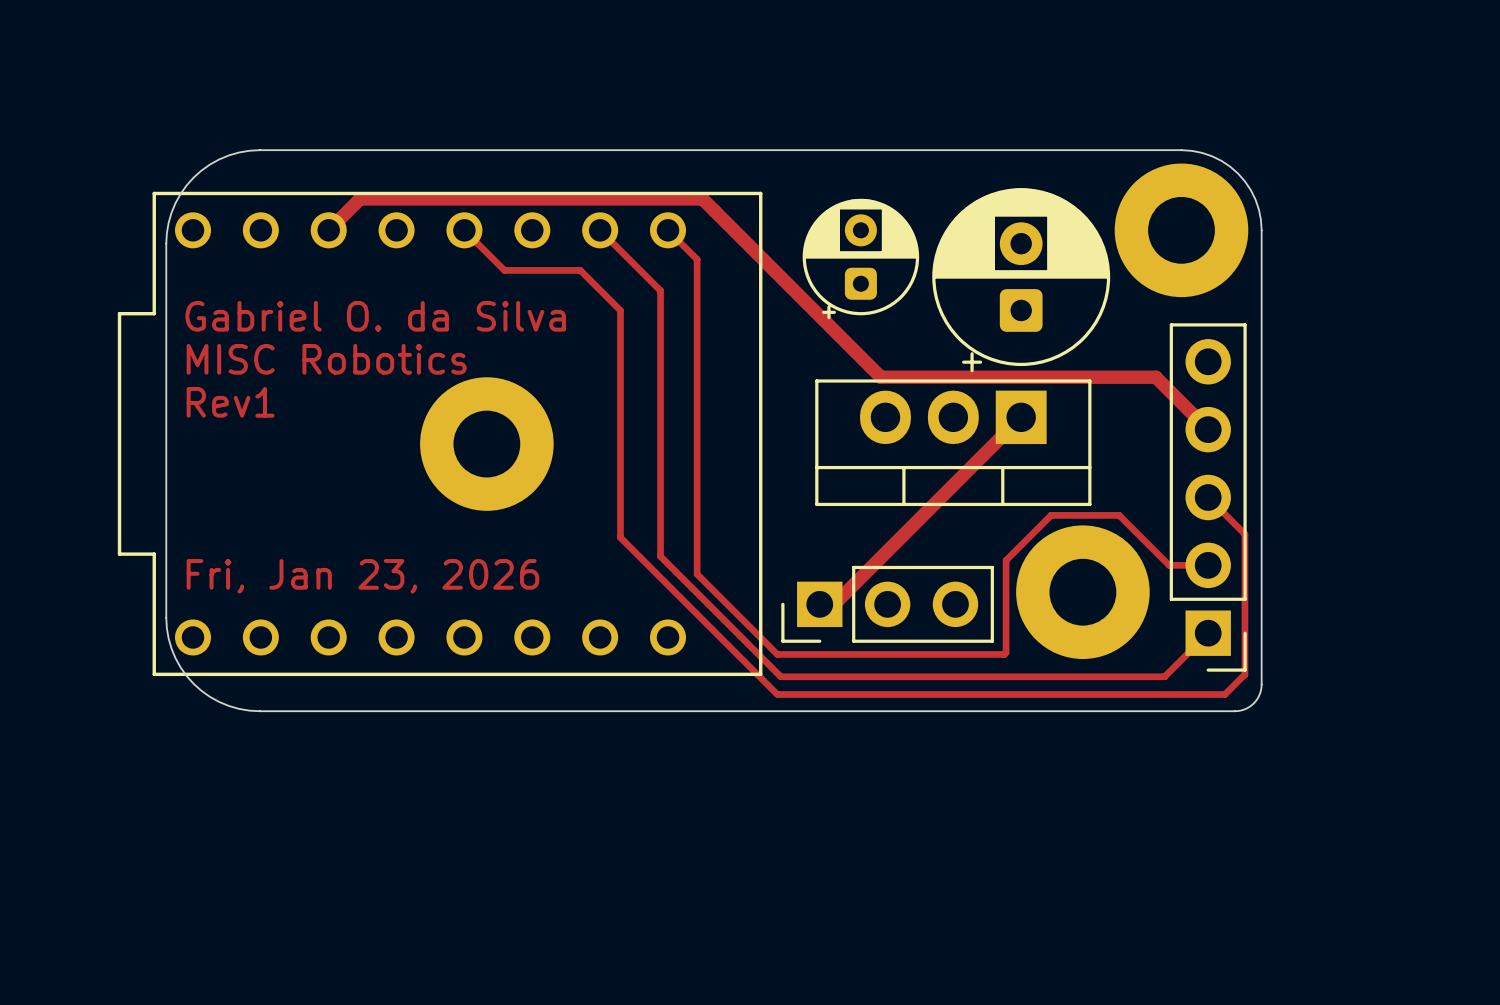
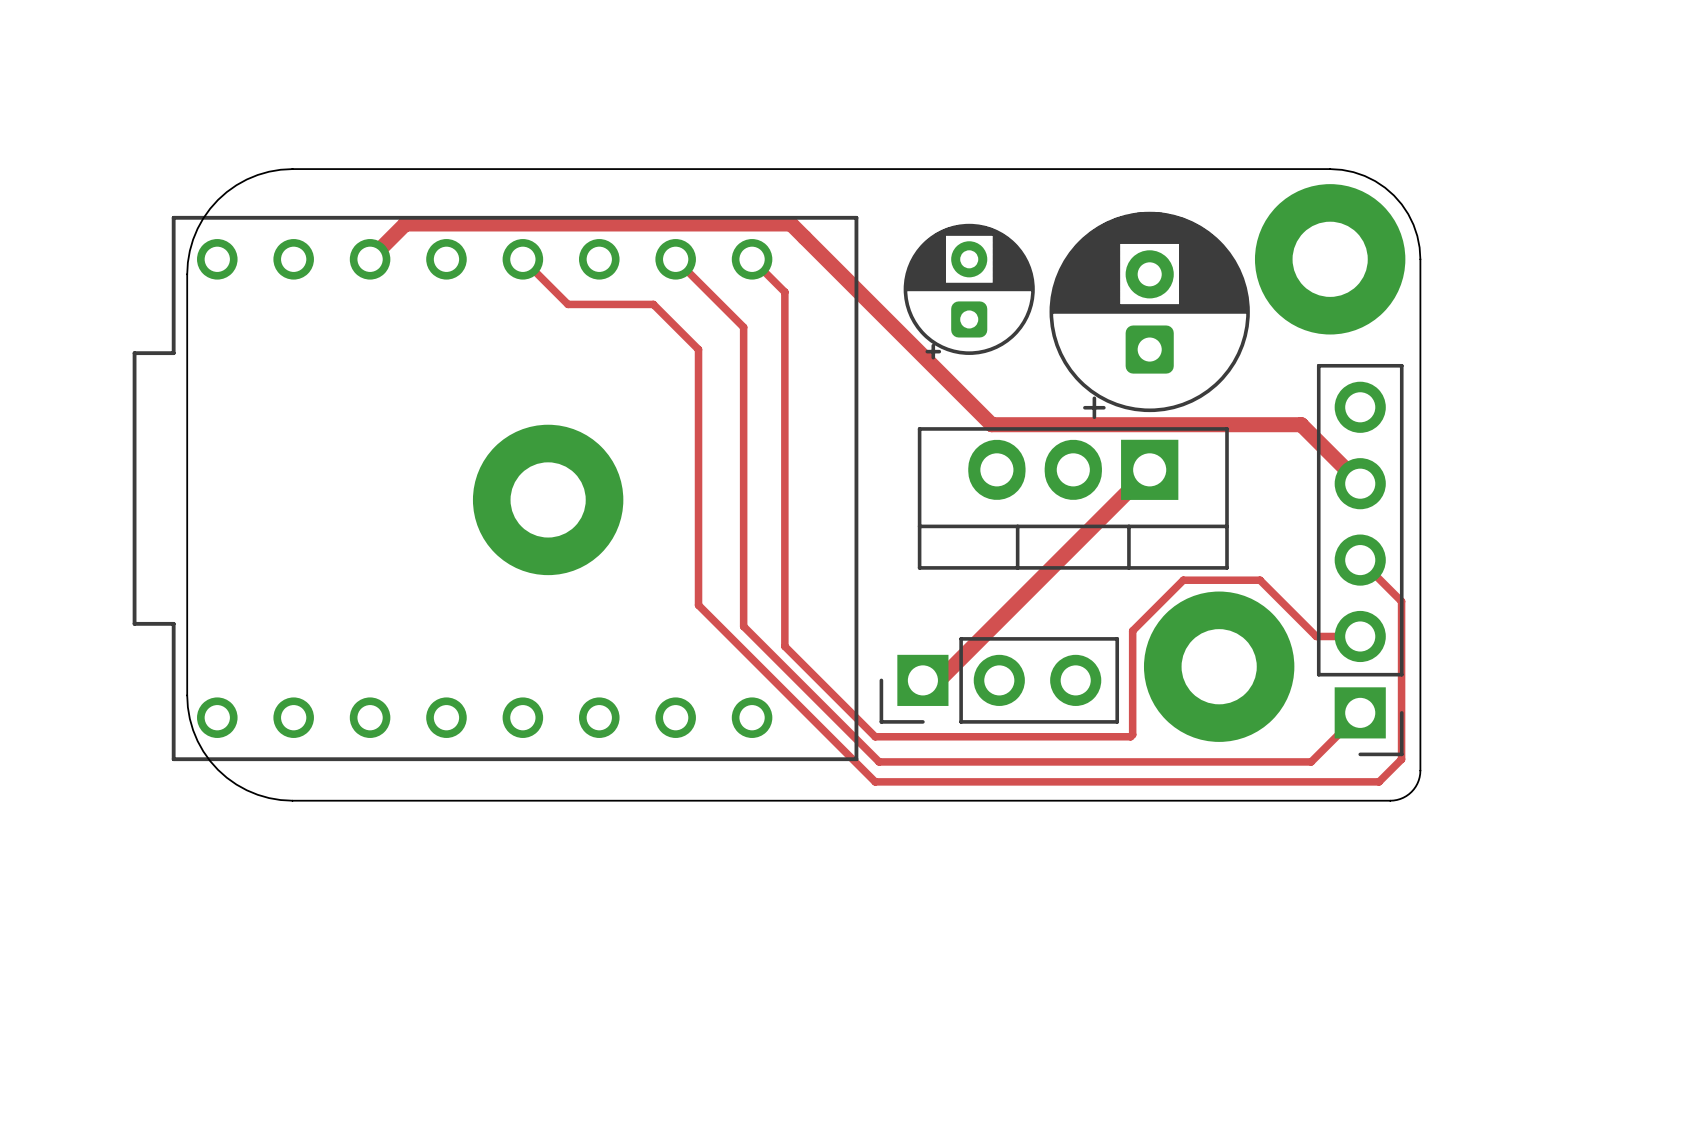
text: Gabriel O. da Silva (375, 316) -> none
text: MISC Robotics (326, 359) -> none
text: Rev1 (230, 402) -> none
text: Fri, Jan 23, 2026 (362, 576) -> none

